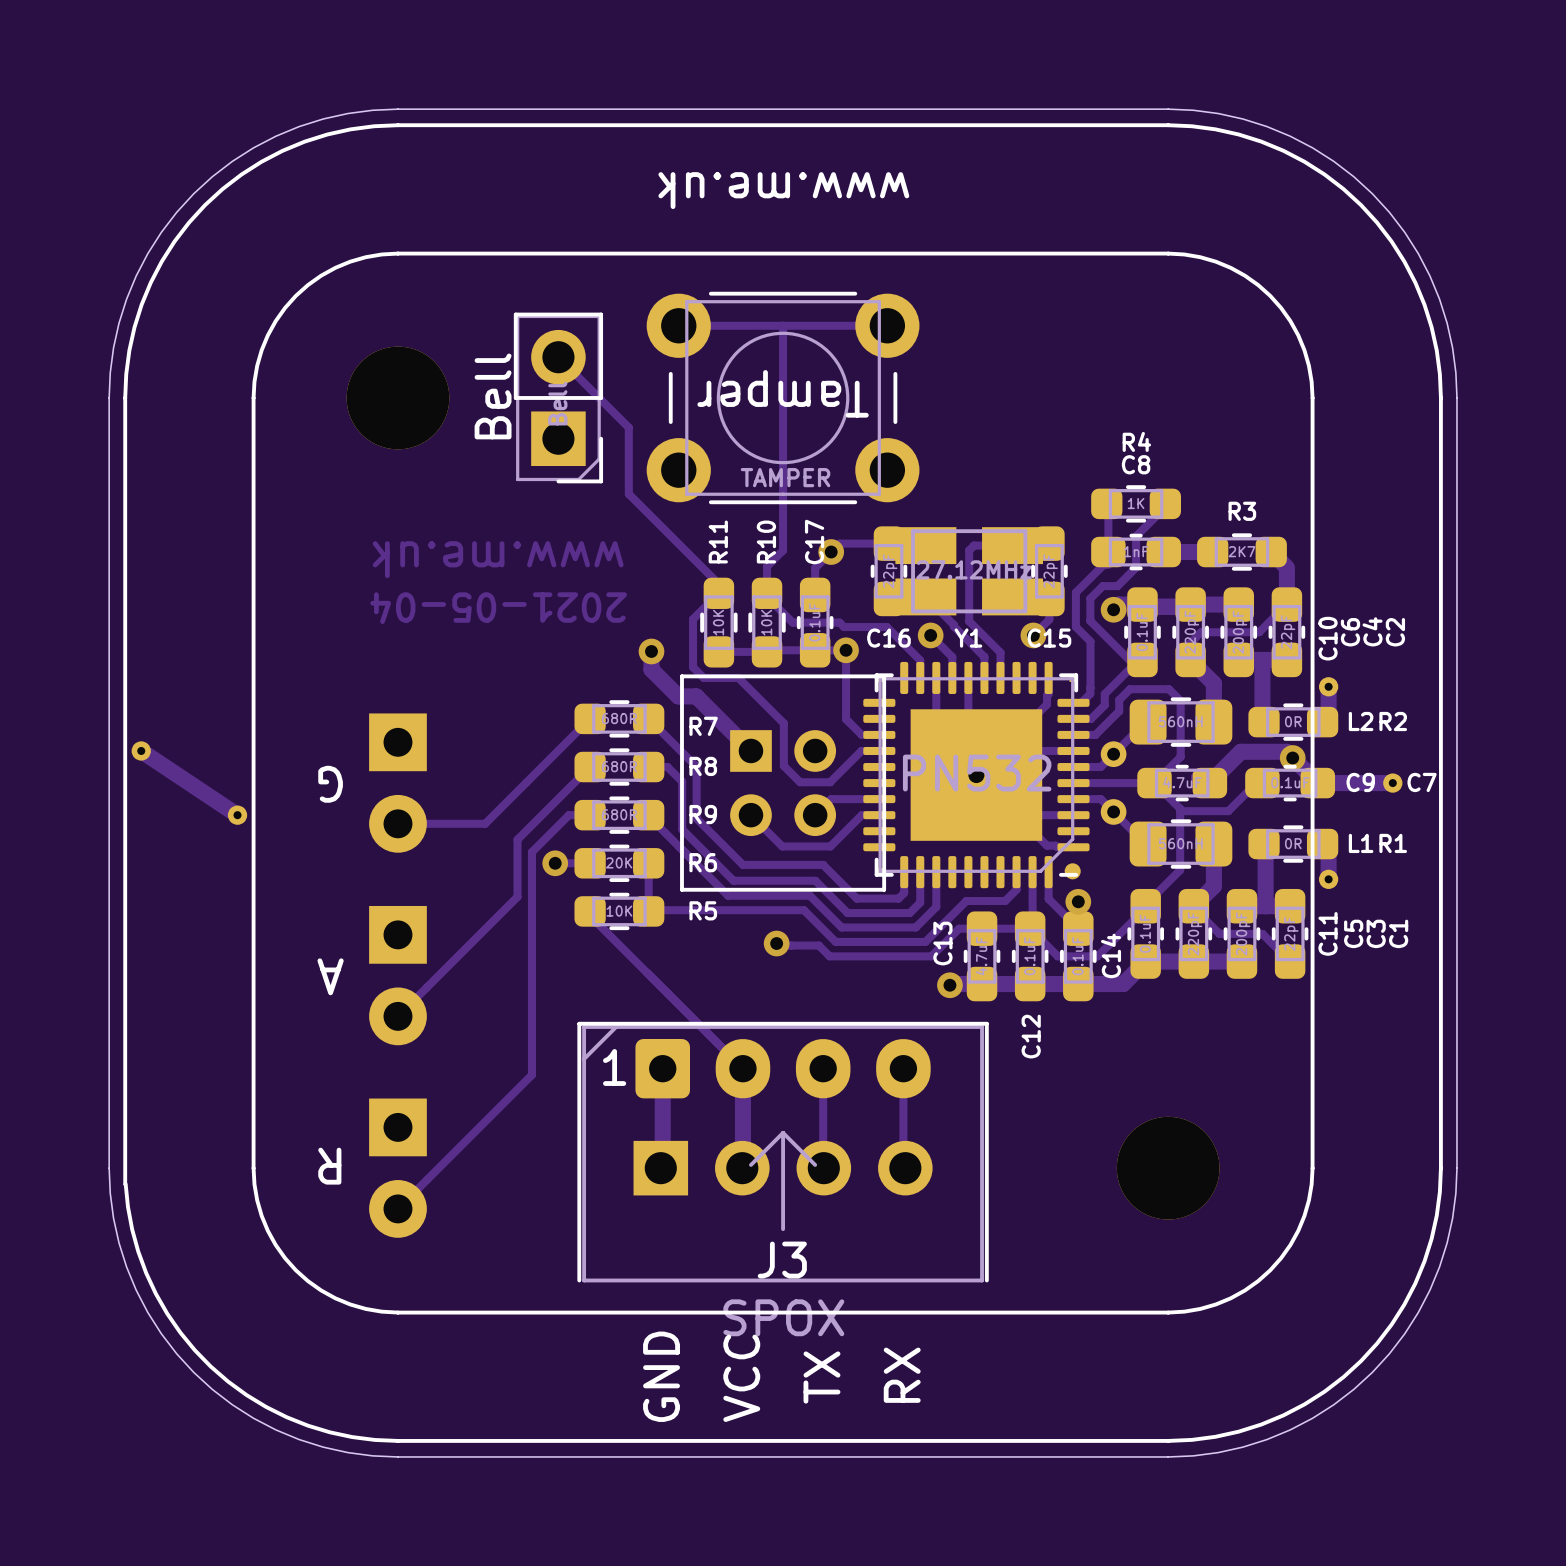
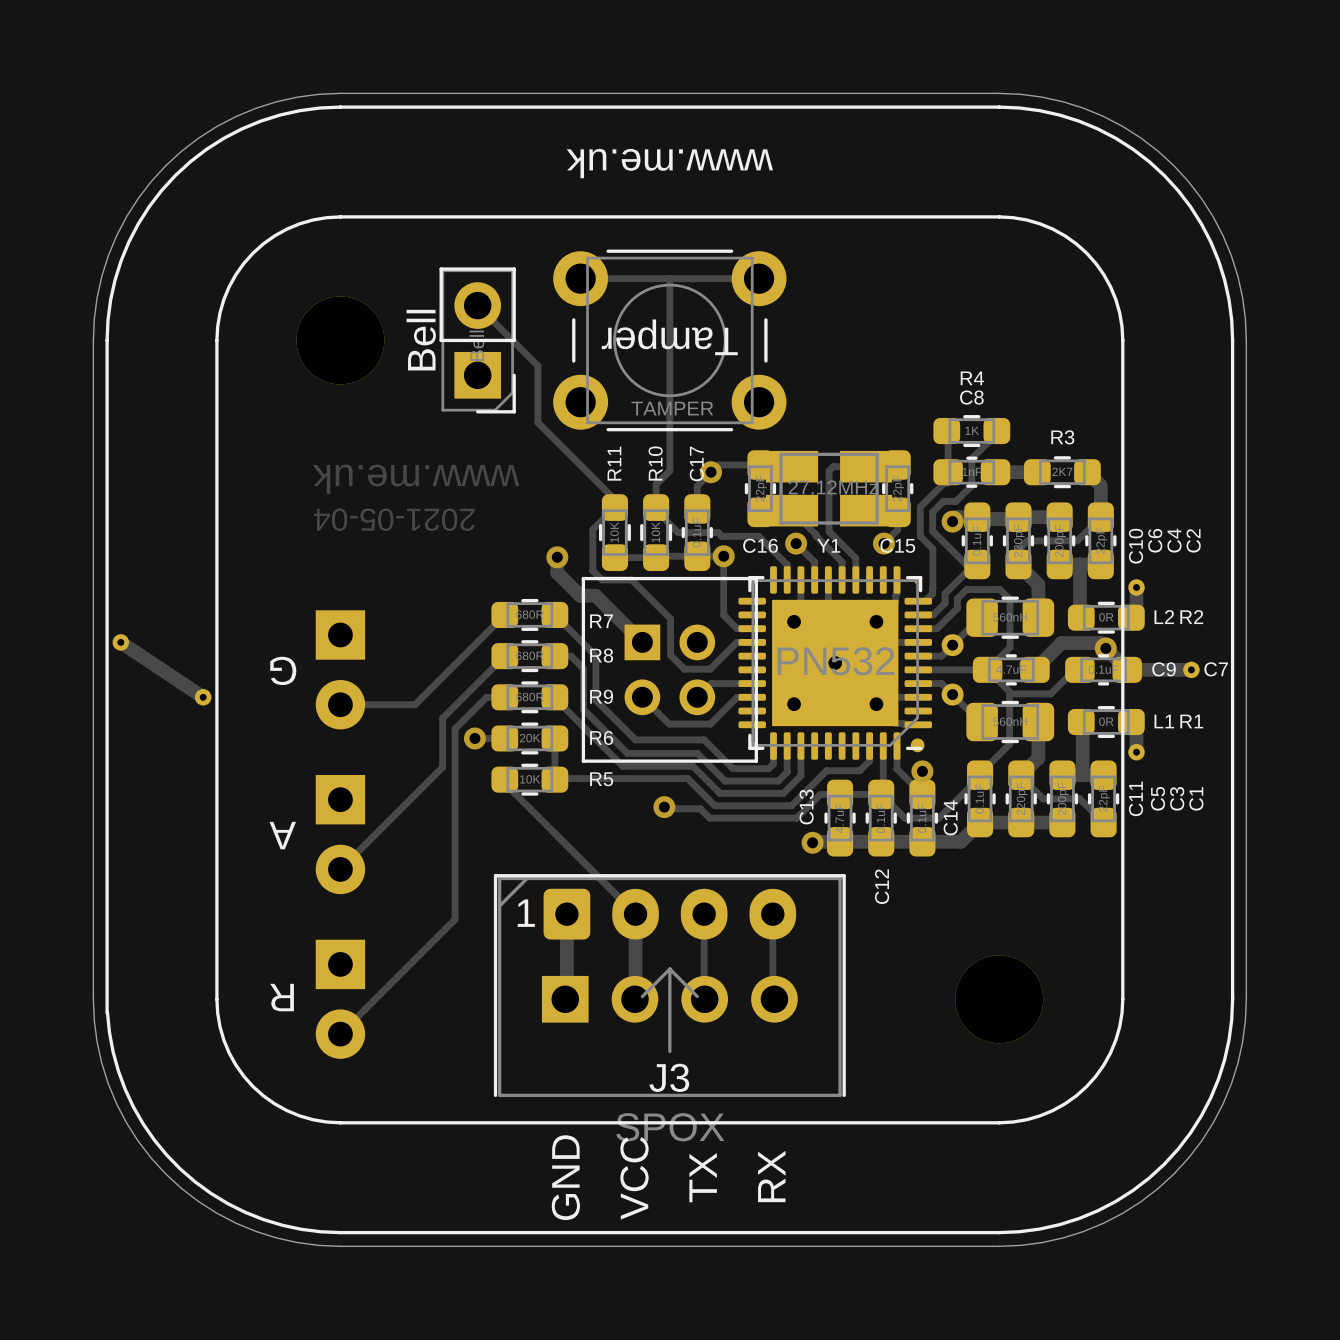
part footprint: [863, 661, 1090, 889] -> [738, 566, 933, 760]

